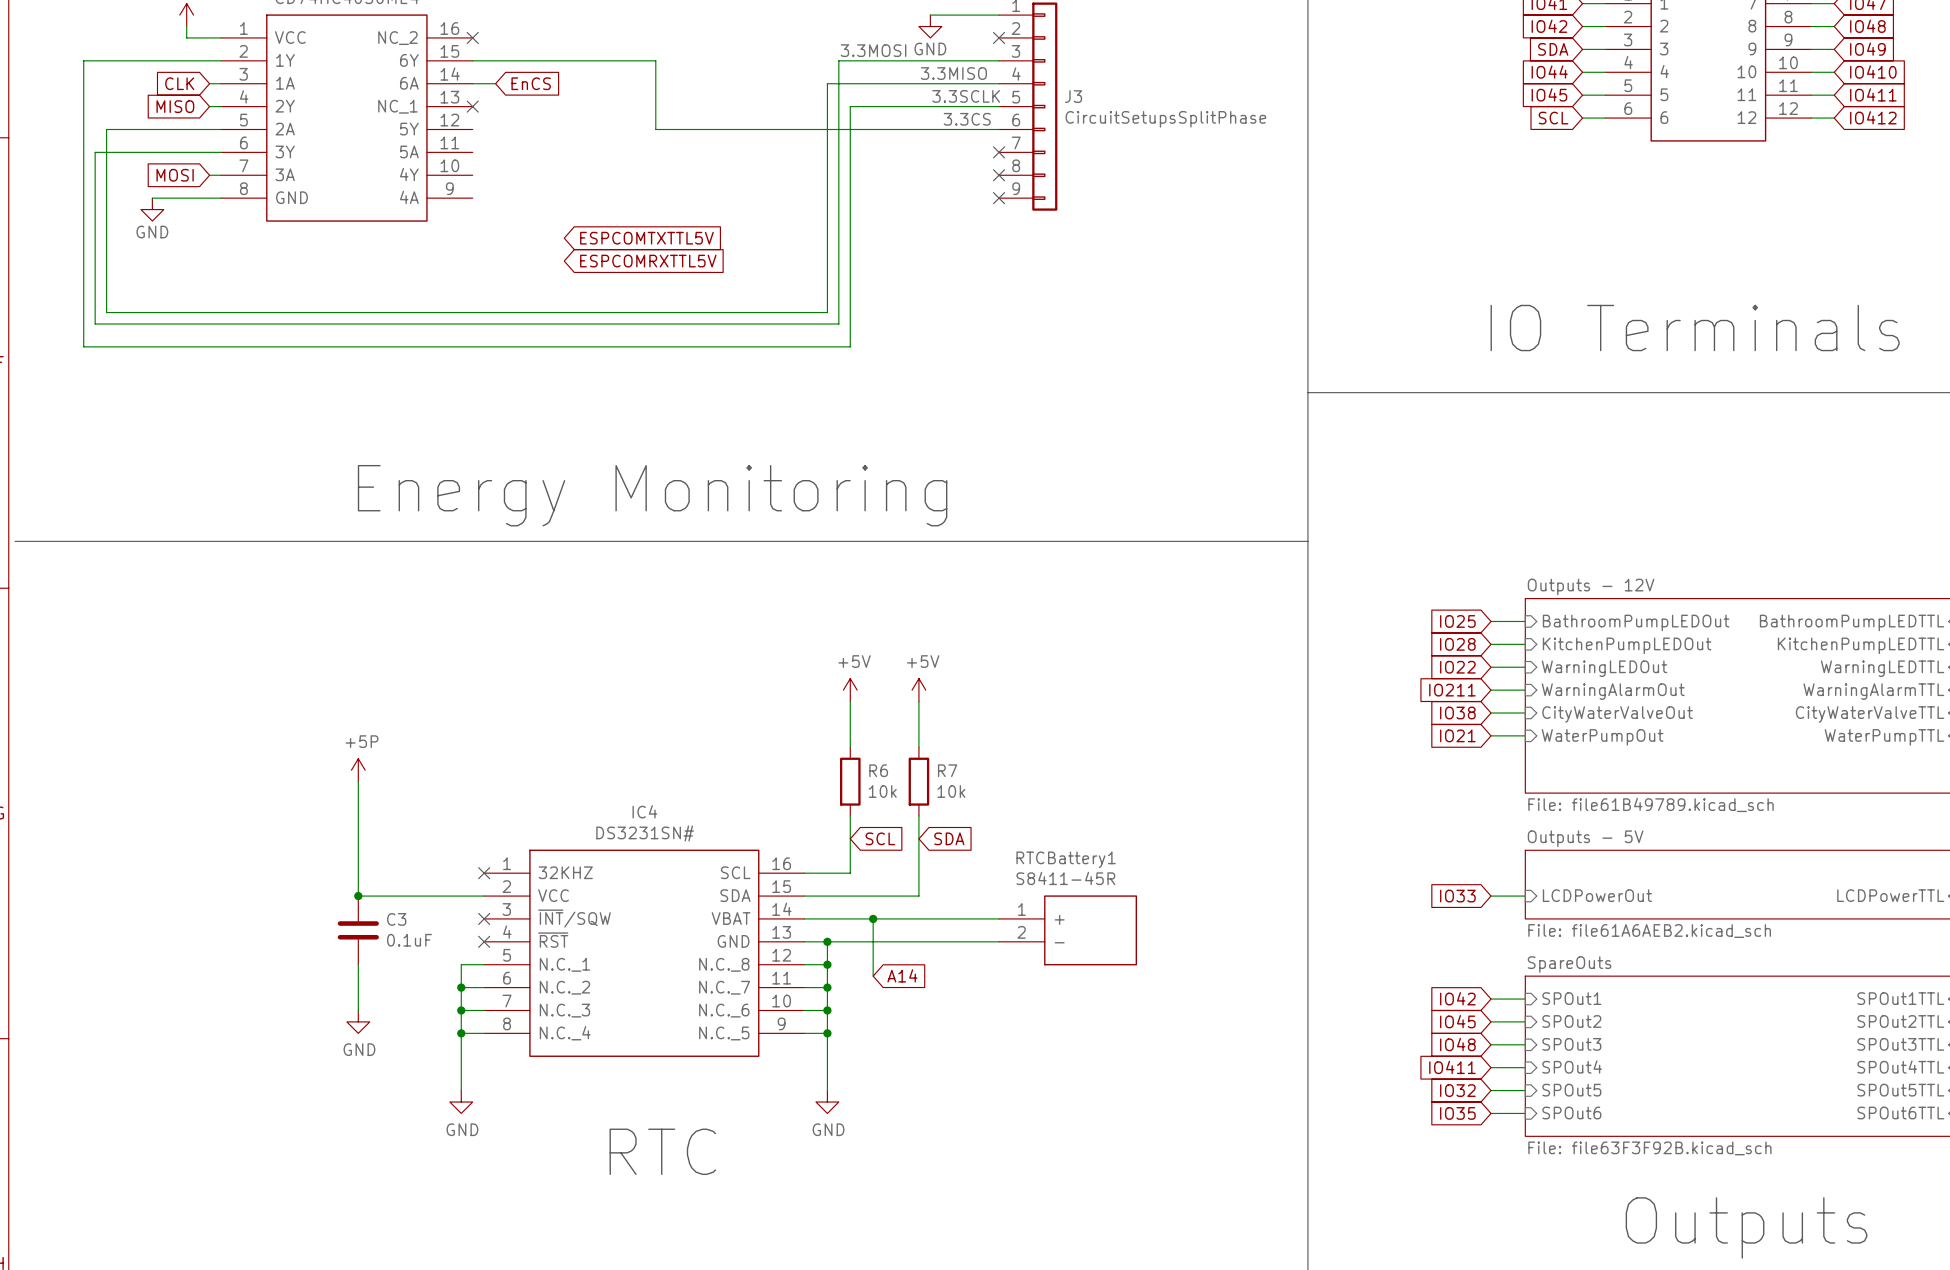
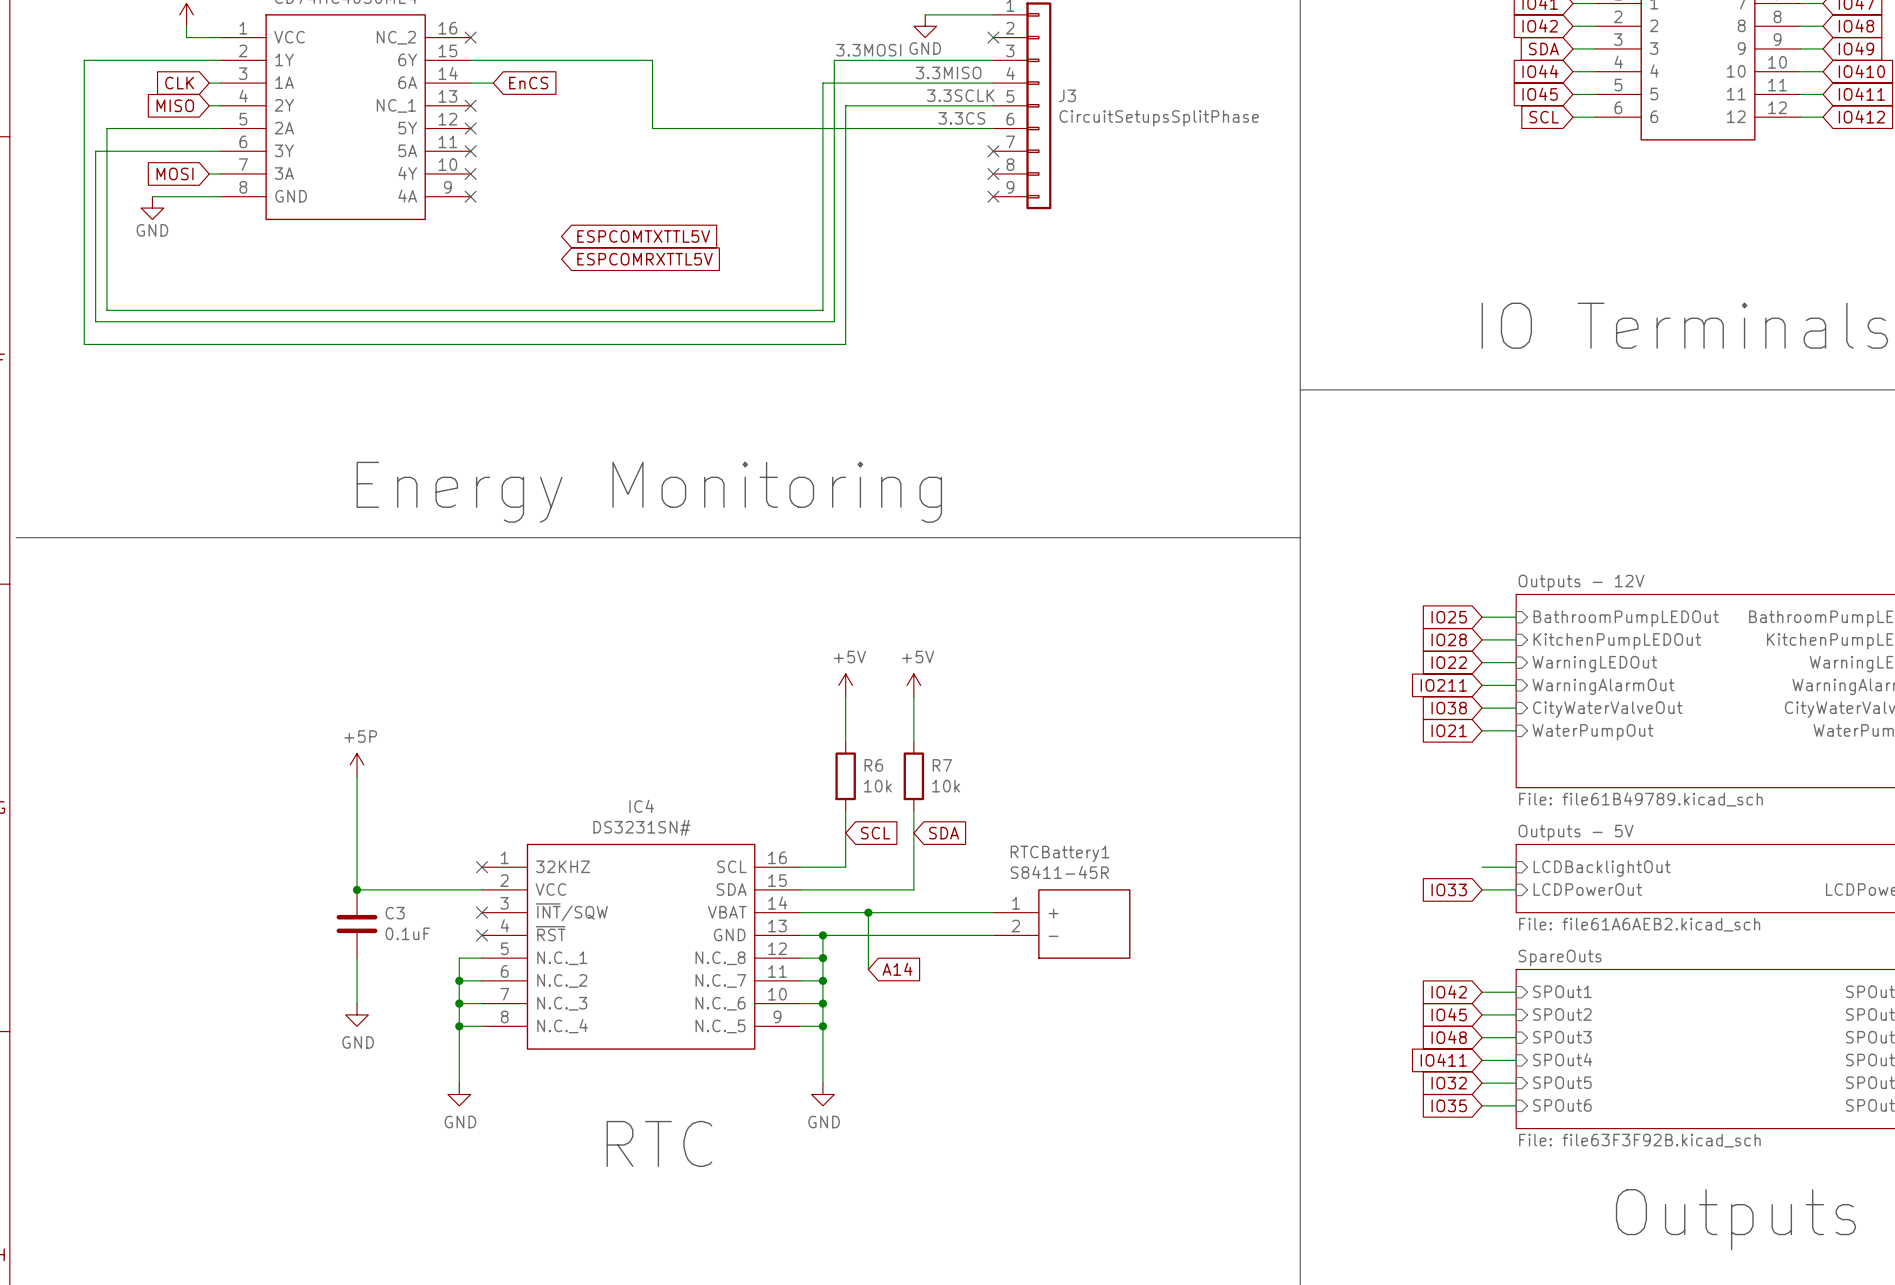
no-connect mark: none -> (470, 128)
no-connect mark: none -> (470, 151)
no-connect mark: none -> (470, 173)
no-connect mark: none -> (470, 196)
wire: none -> (1482, 867) (1516, 867)
sheet pin: none -> LCDBacklightOut (1602, 868)

